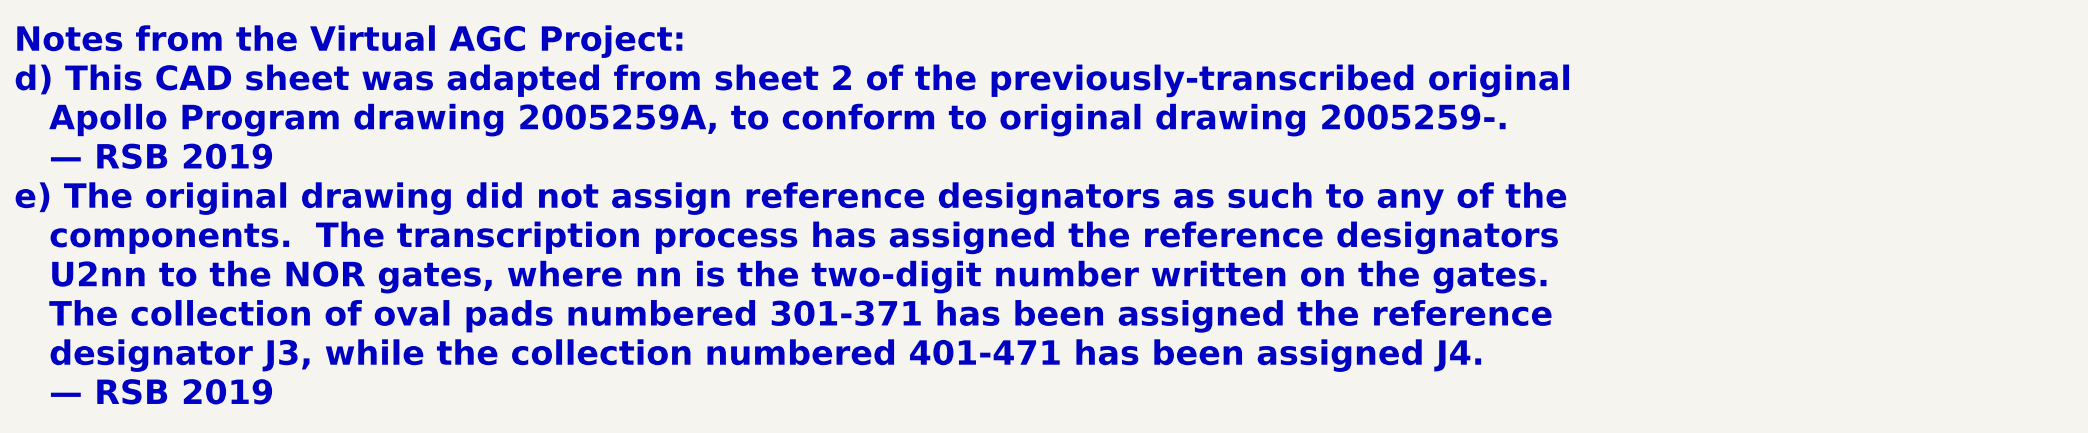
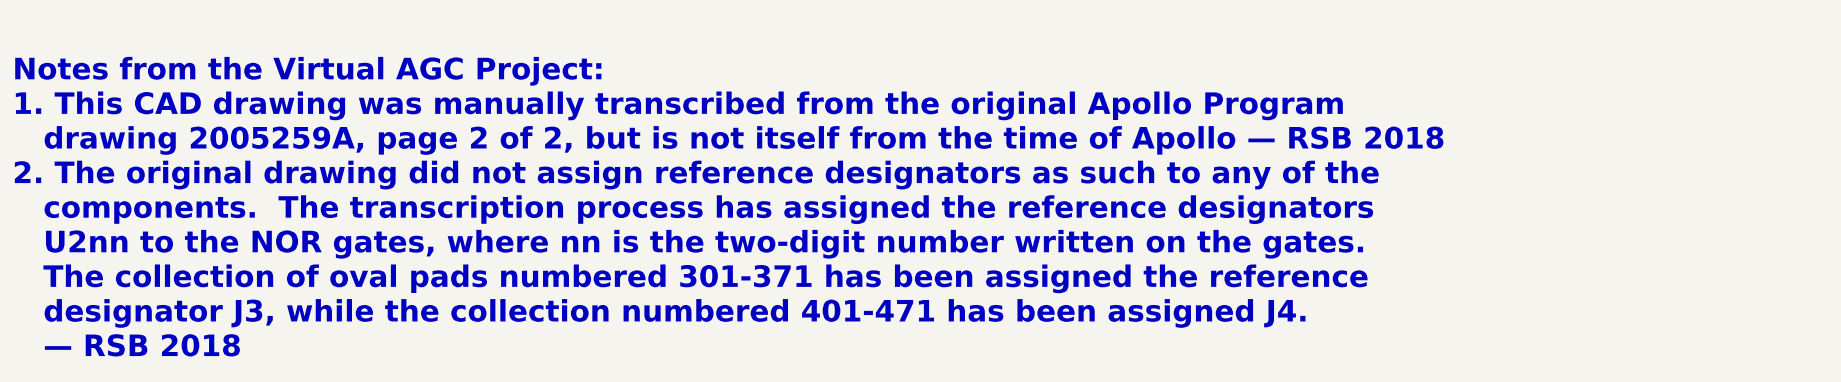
text: Notes from the Virtual AGC Project: (349, 41) -> none
text: d) This CAD sheet was adapted from sheet 2 of the previously-transcribed original (792, 80) -> Notes from the Virtual AGC Project: (308, 71)
text: Apollo Program drawing 2005259A, to conform to original drawing 2005259-. (777, 120) -> 1. This CAD drawing was manually transcribed from the original Apollo Program (679, 105)
text: — RSB 2019 (161, 156) -> drawing 2005259A, page 2 of 2, but is not itself from the time of Apollo — RSB 2018 (743, 140)
text: e) The original drawing did not assign reference designators as such to any of the (790, 198) -> 2. The original drawing did not assign reference designators as such to any of the (696, 175)
text: — RSB 2019 (161, 391) -> — RSB 2018 (142, 345)

